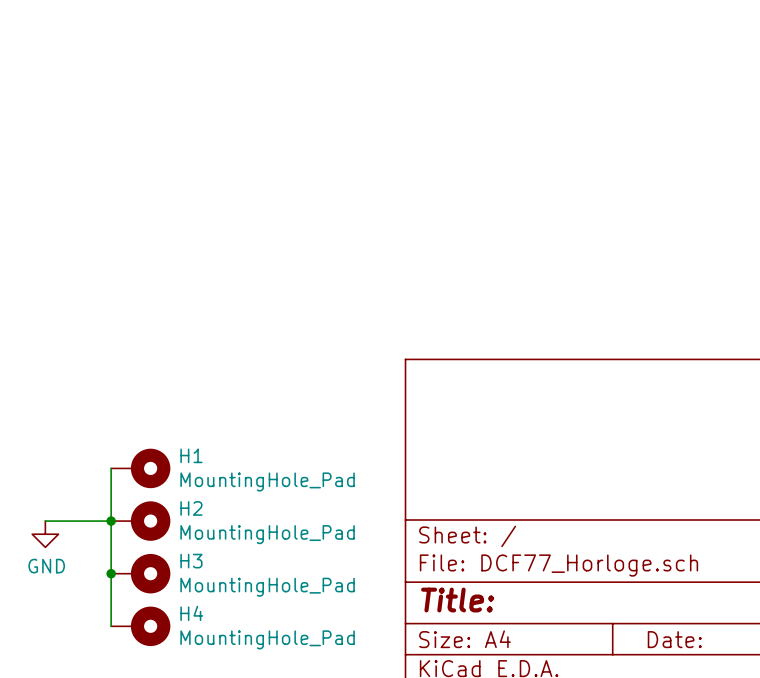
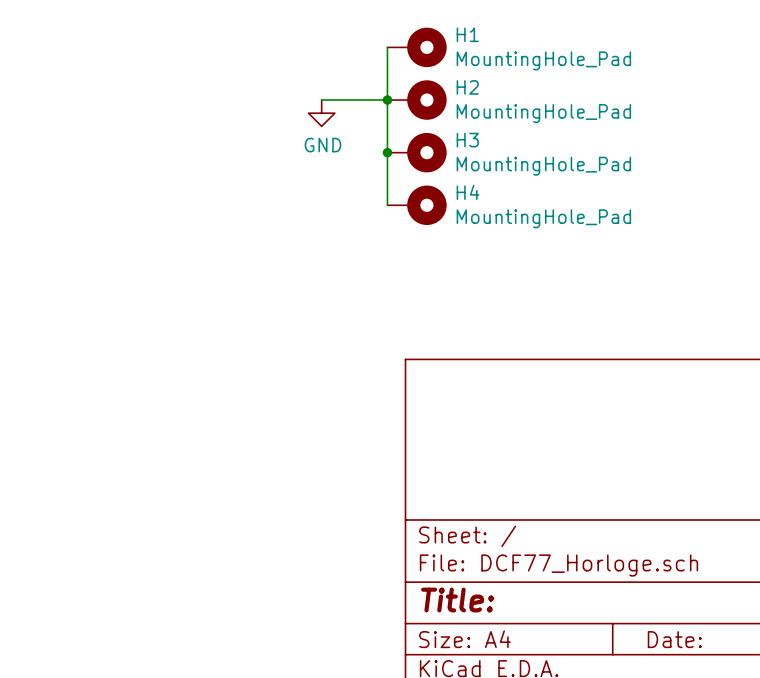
wire: none -> (387, 47) (387, 205)
wire: none -> (321, 100) (387, 100)
junction: none -> (387, 100)
power symbol: none -> GND (321, 113)
junction: none -> (387, 152)
wire: (111, 468) (111, 626) -> none
H1 position: (140, 468) -> (417, 47)
wire: (45, 521) (111, 521) -> none
junction: (111, 521) -> none
H2 position: (140, 521) -> (417, 100)
power symbol: GND (45, 534) -> none
junction: (111, 573) -> none
H3 position: (140, 573) -> (417, 152)
H4 position: (140, 626) -> (417, 205)

